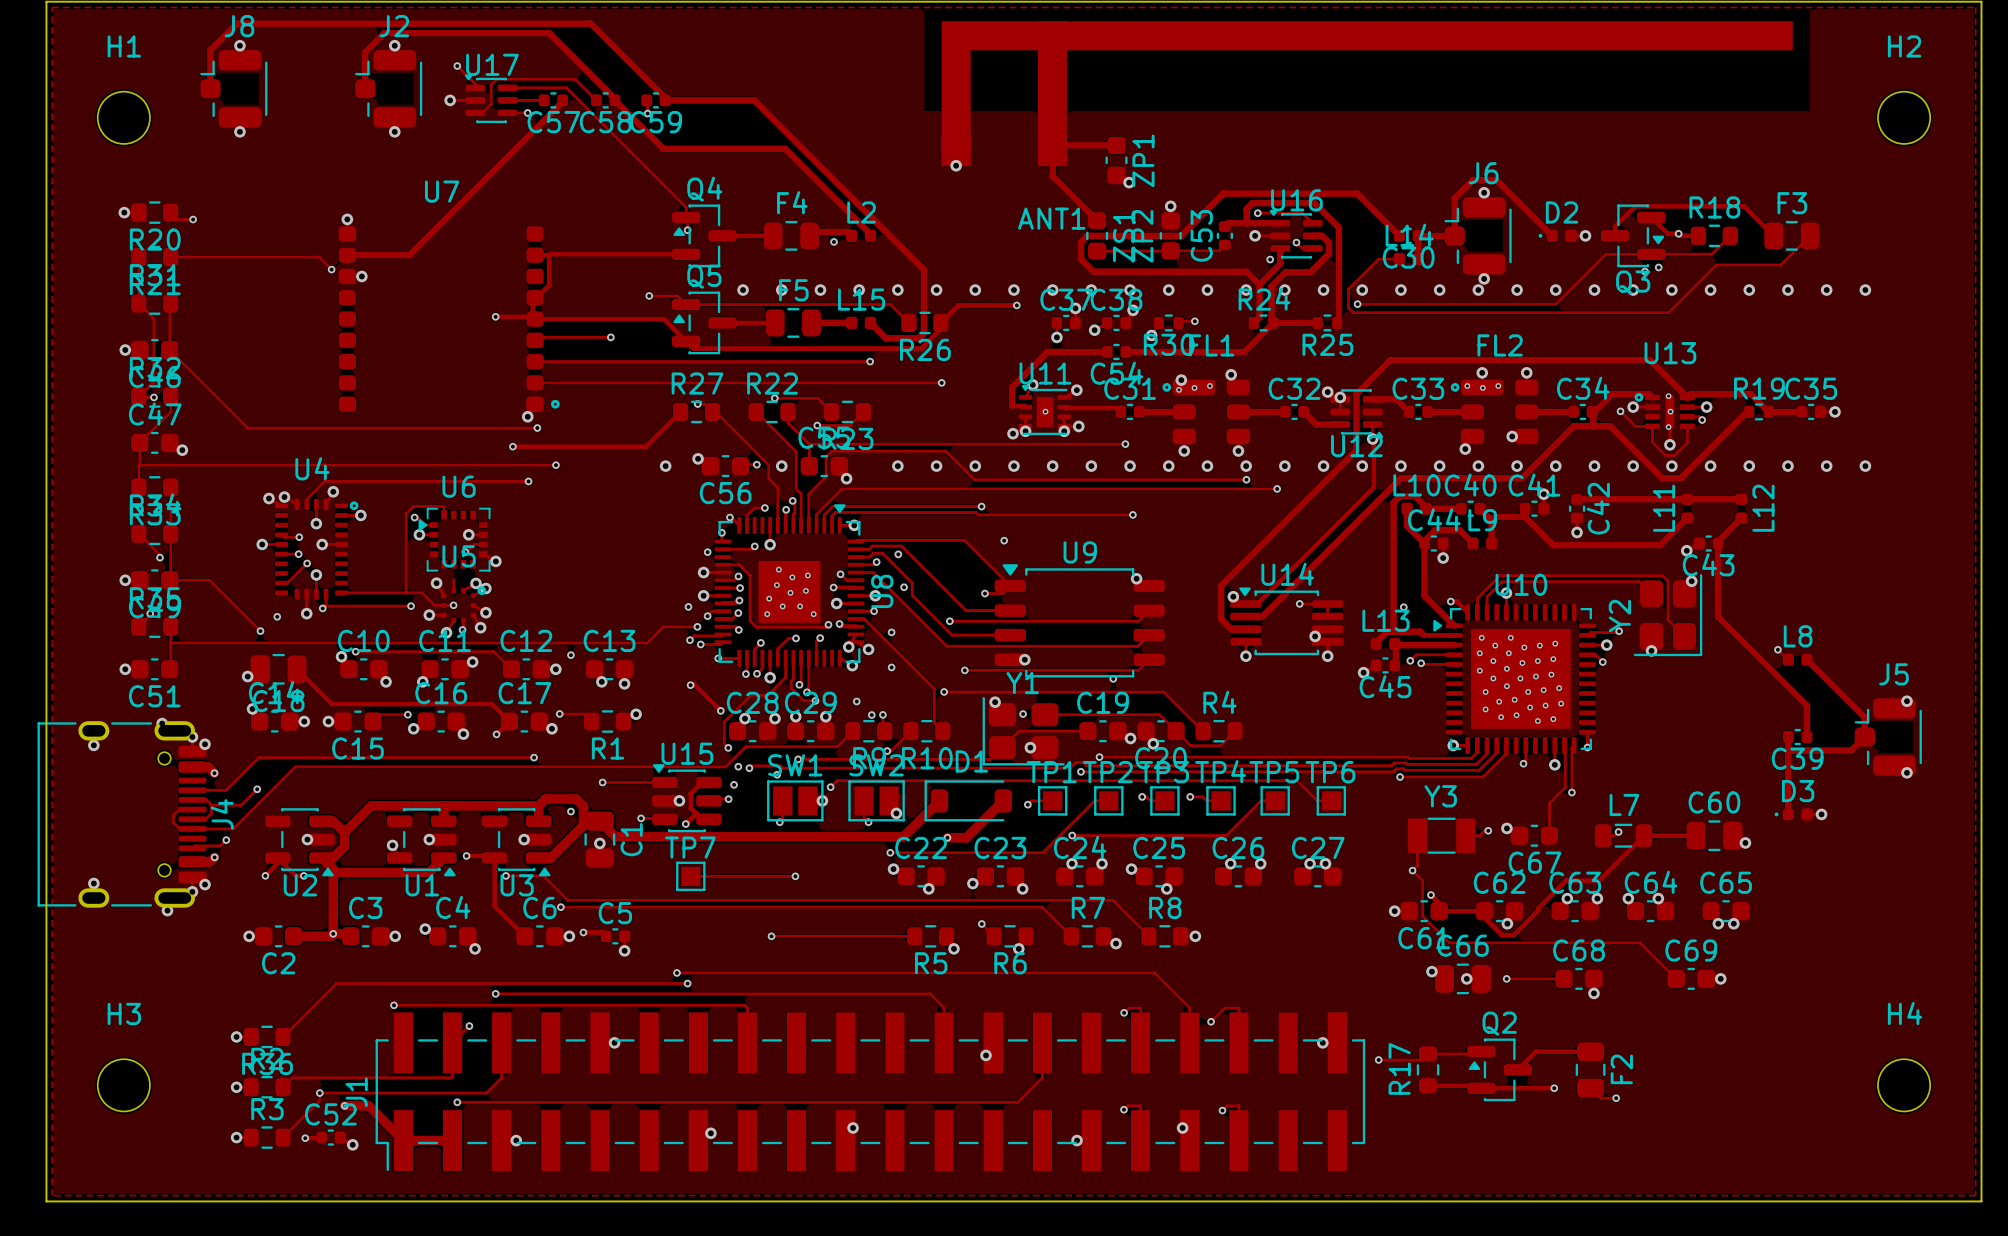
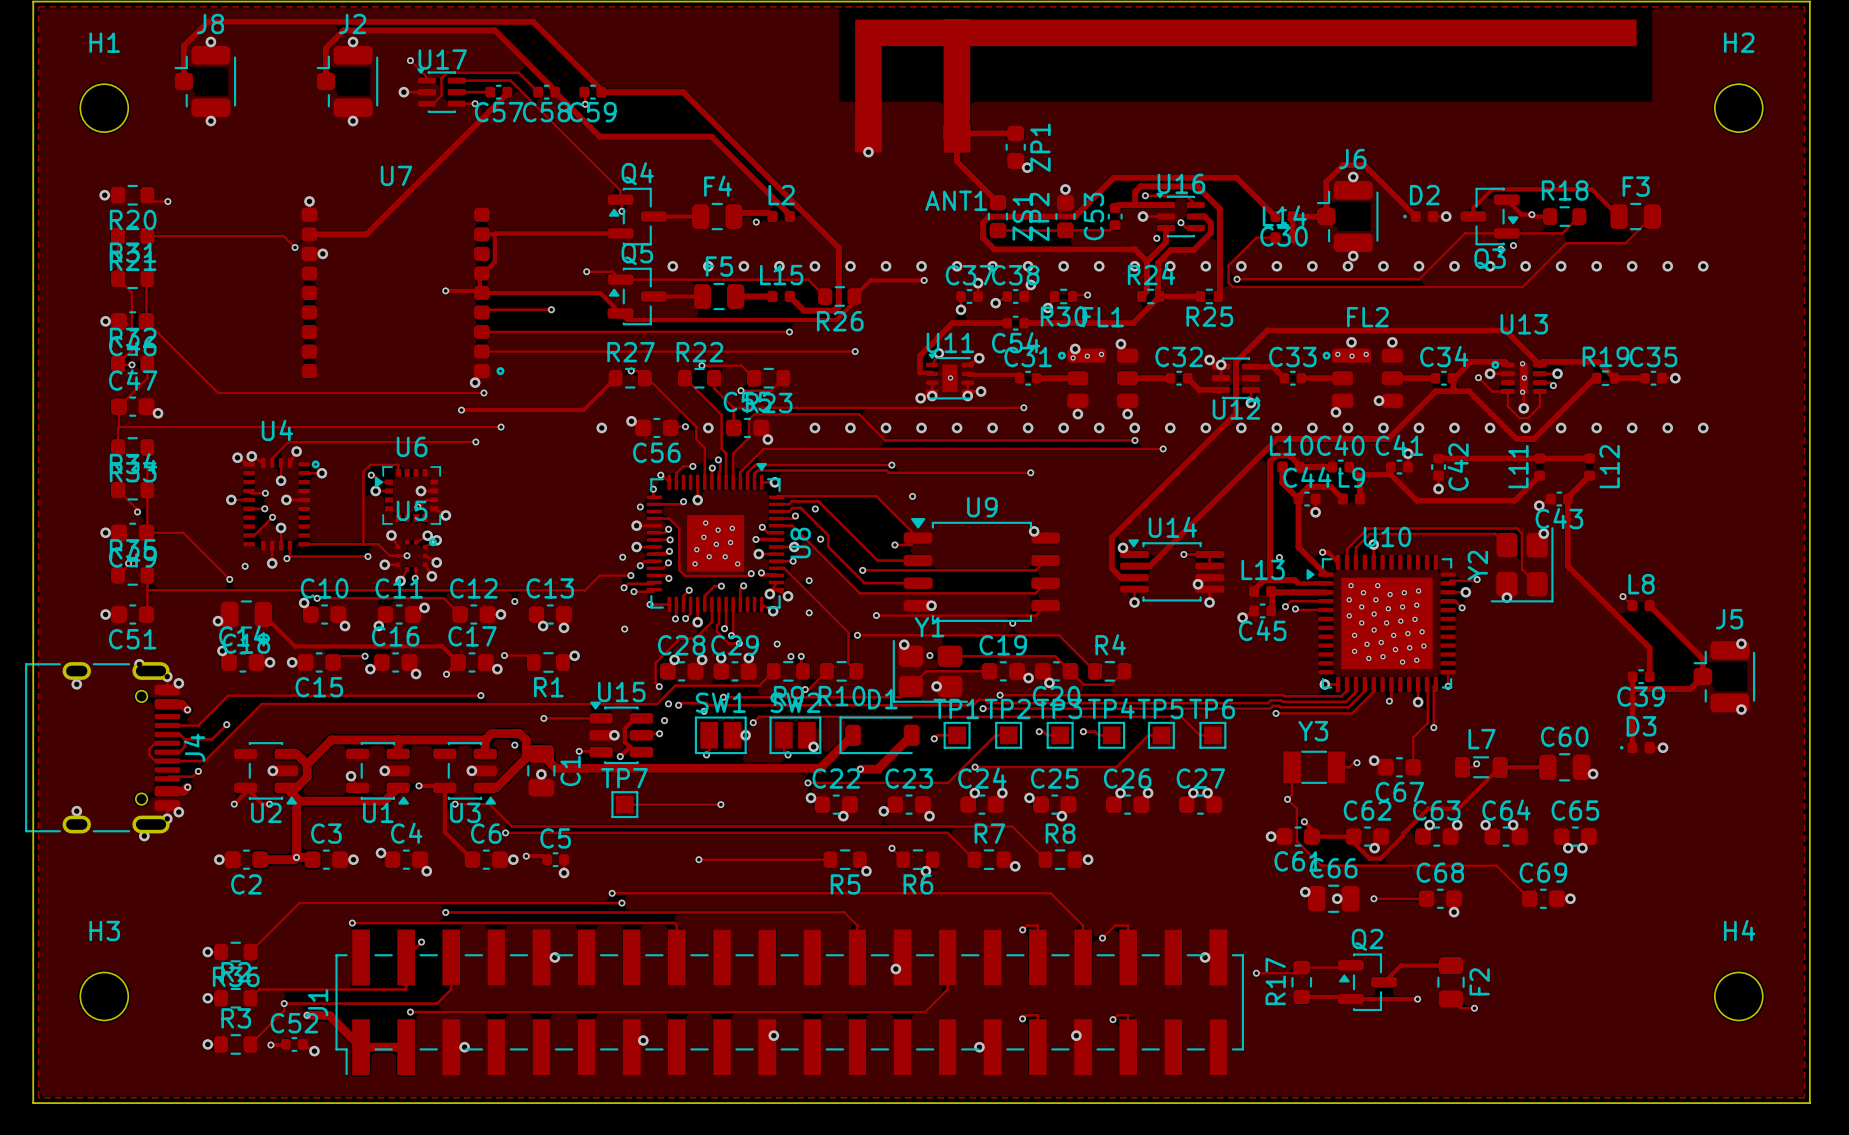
track: (1373, 438) (1373, 487) (1260, 600) -> none
track: (453, 579) (453, 590) -> none
track: (691, 684) (694, 684) (720, 710) -> none
via: (720, 710) -> none

